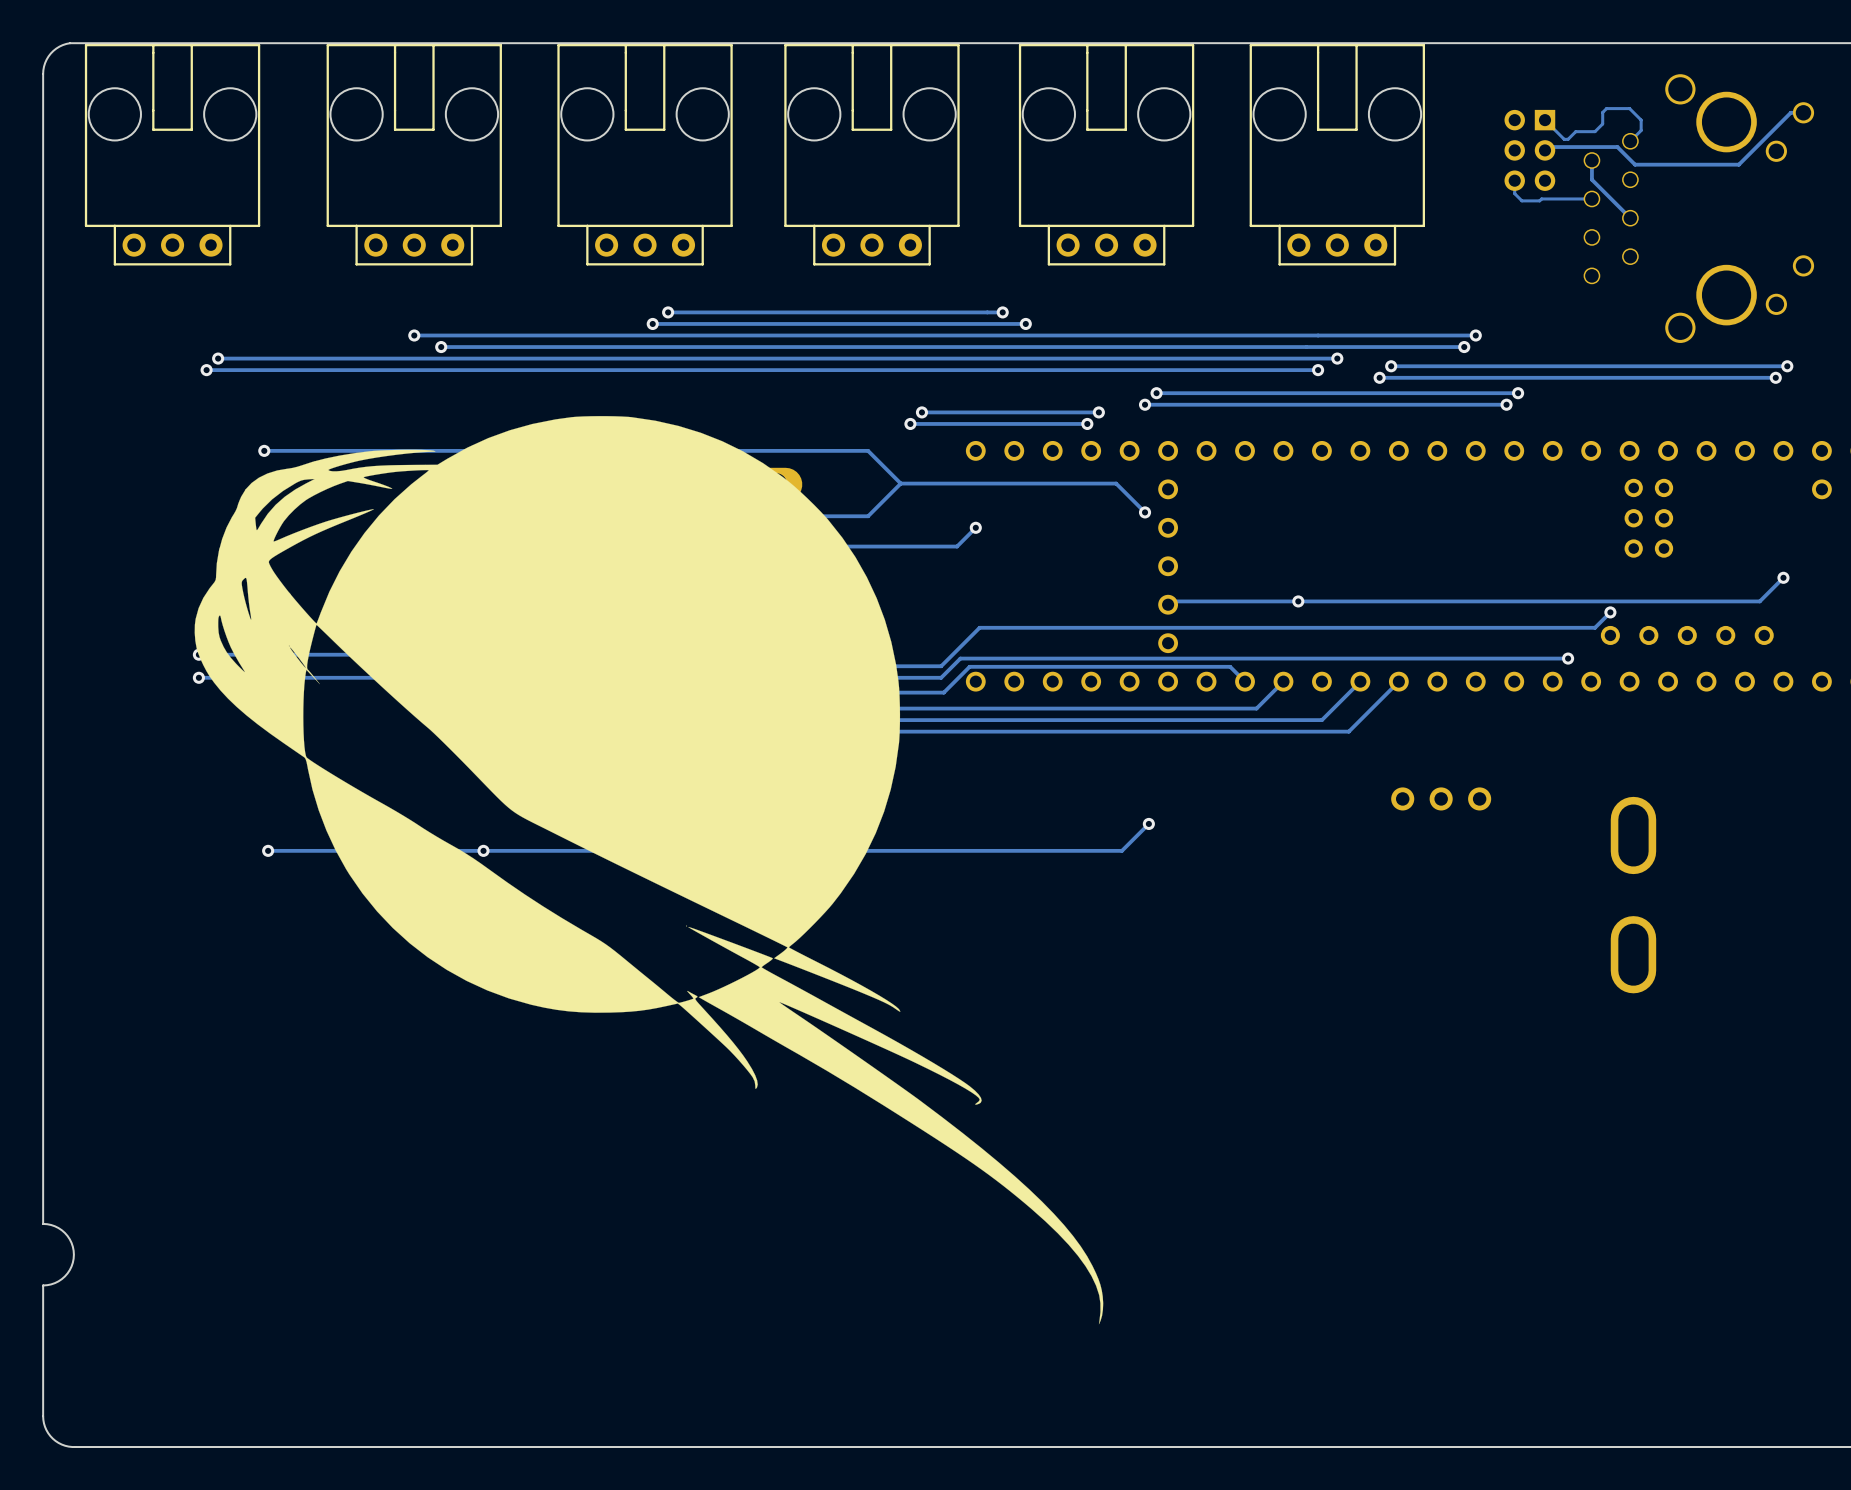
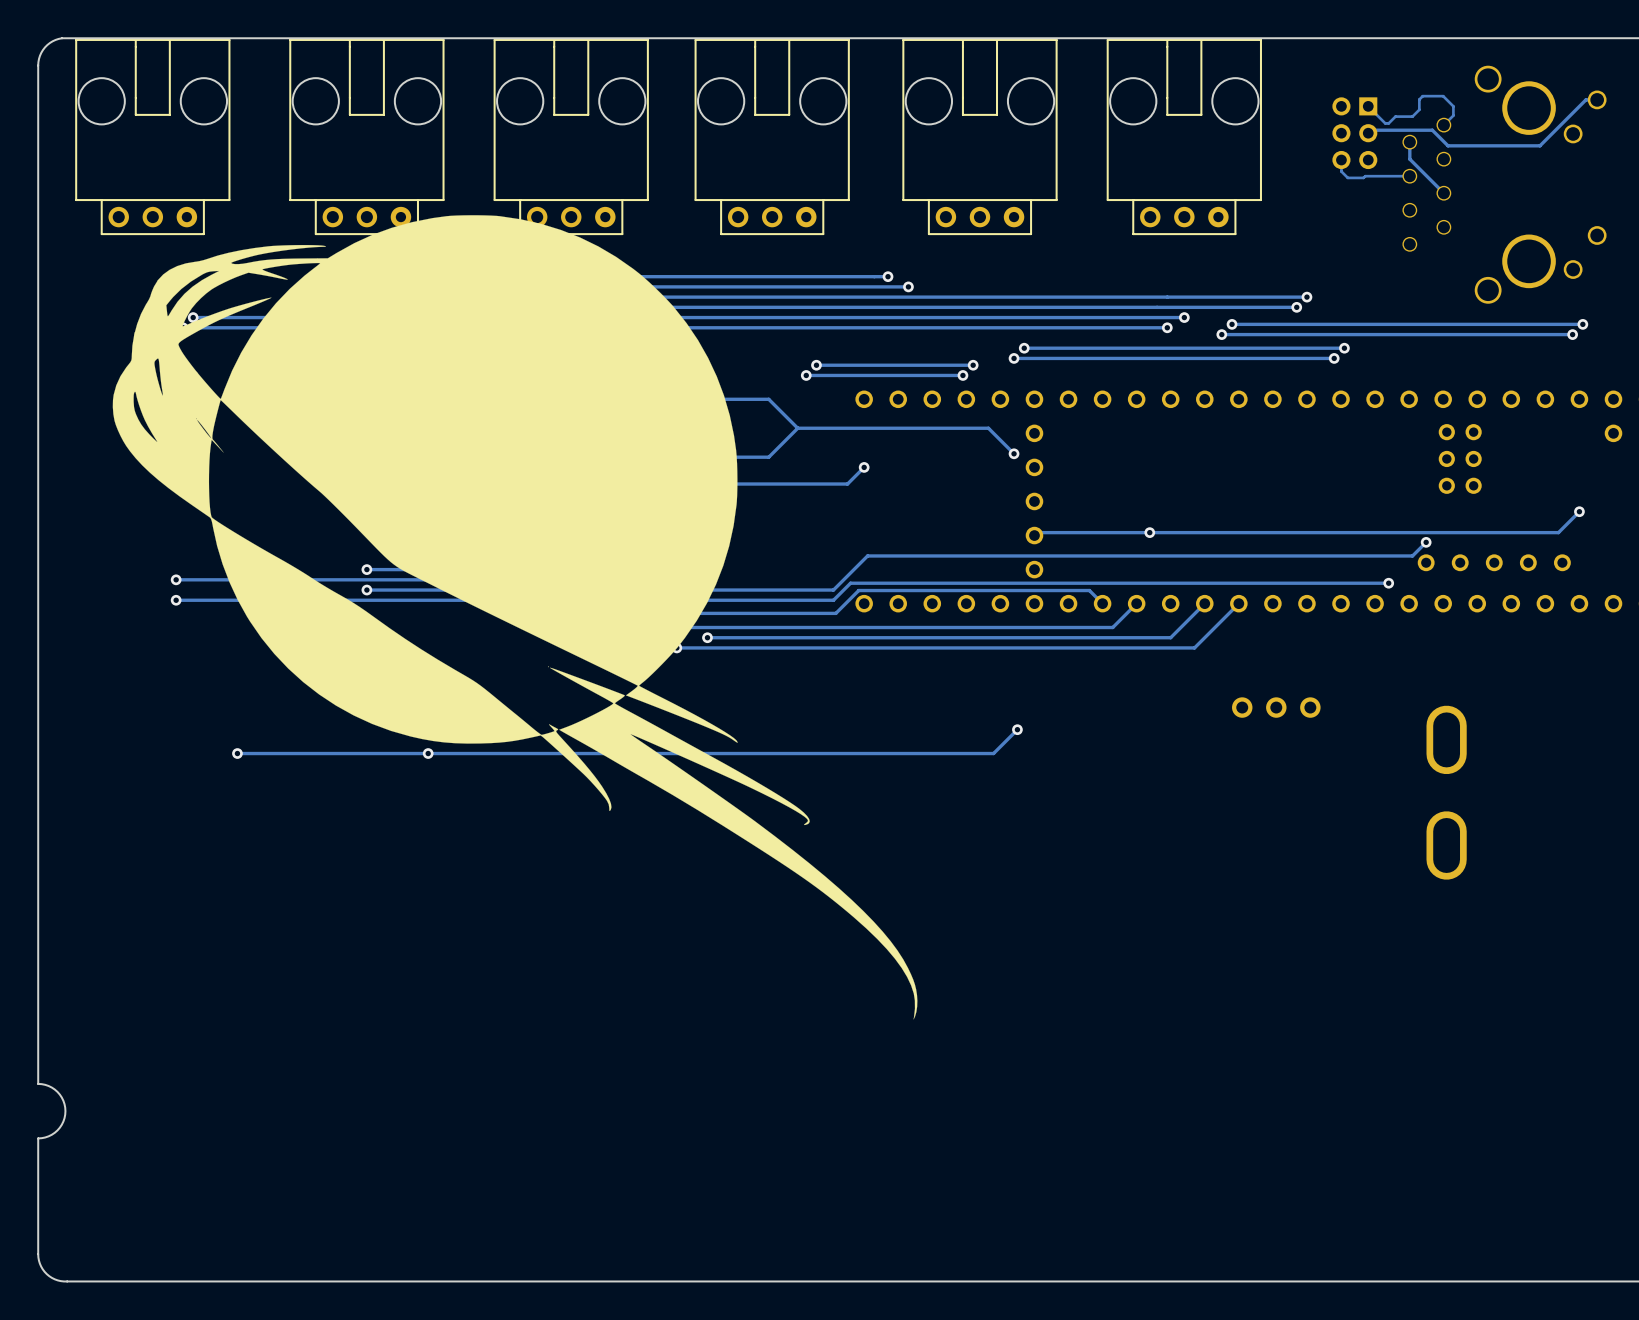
drawing position: (648, 870) -> (515, 617)

